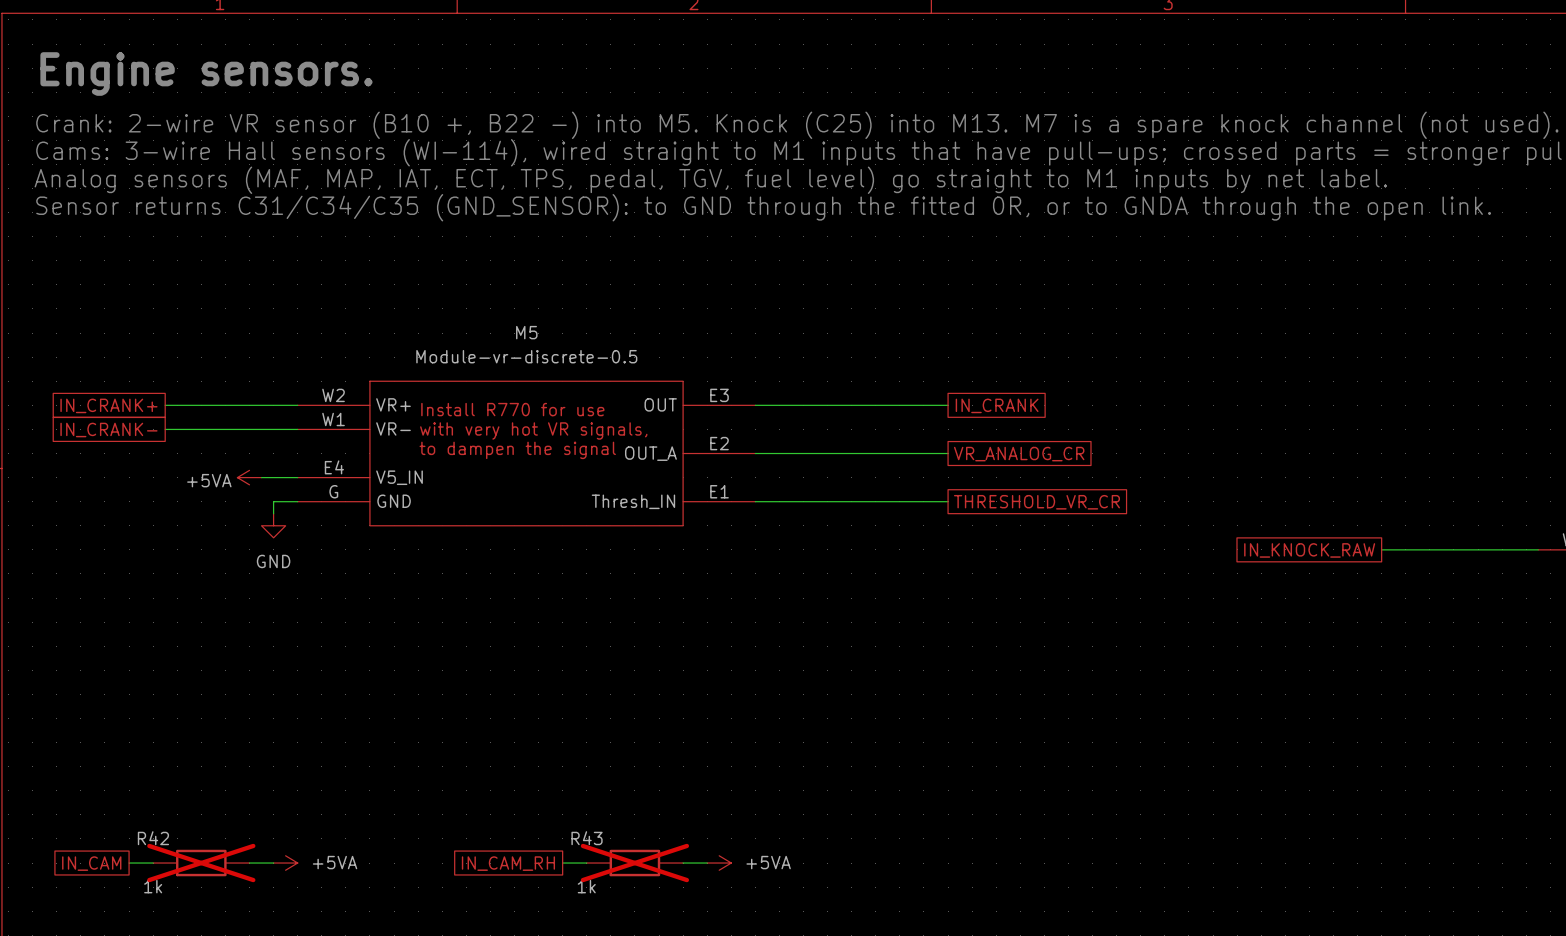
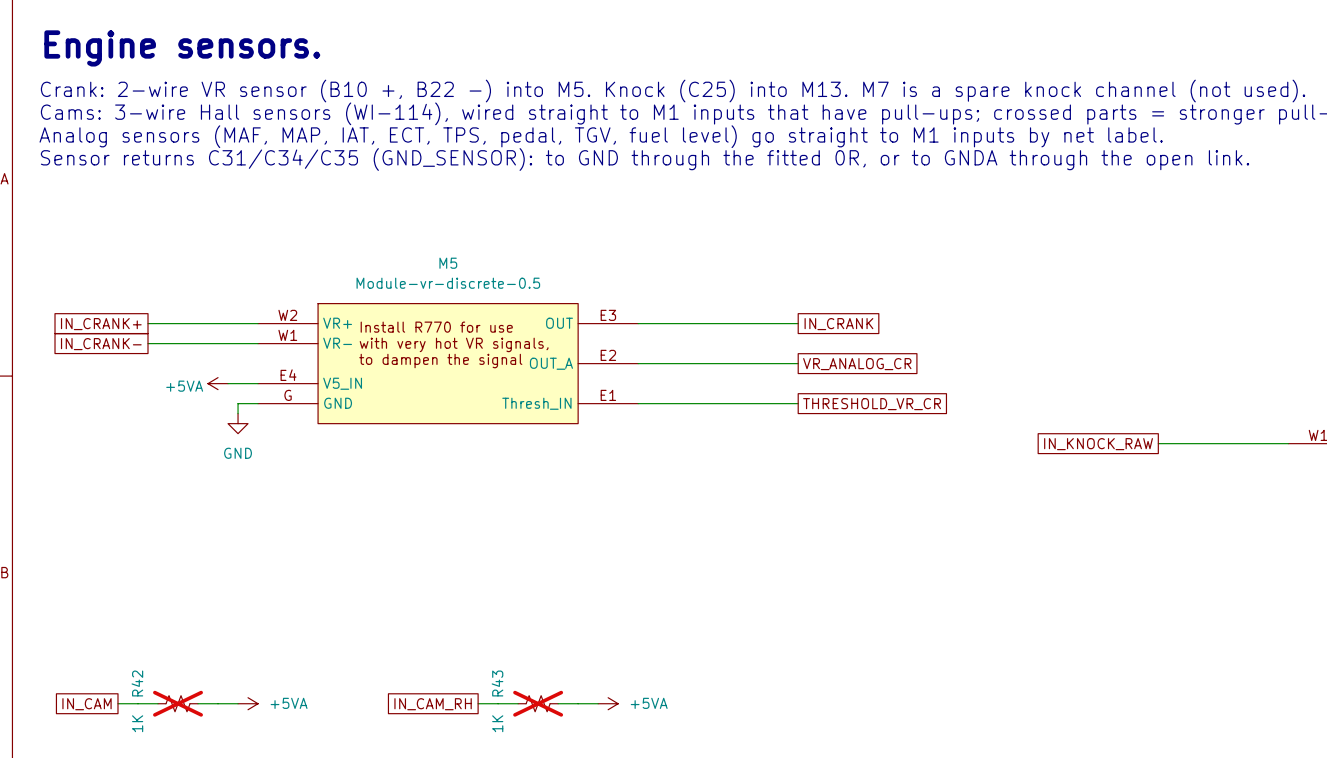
R42 symbol: [153, 849, 250, 877] -> [158, 695, 199, 712]
R43 symbol: [586, 849, 684, 877] -> [518, 695, 559, 712]
R42 value: 1k (153, 886) -> 1K (137, 723)
R43 value: 1k (586, 886) -> 1K (497, 723)

